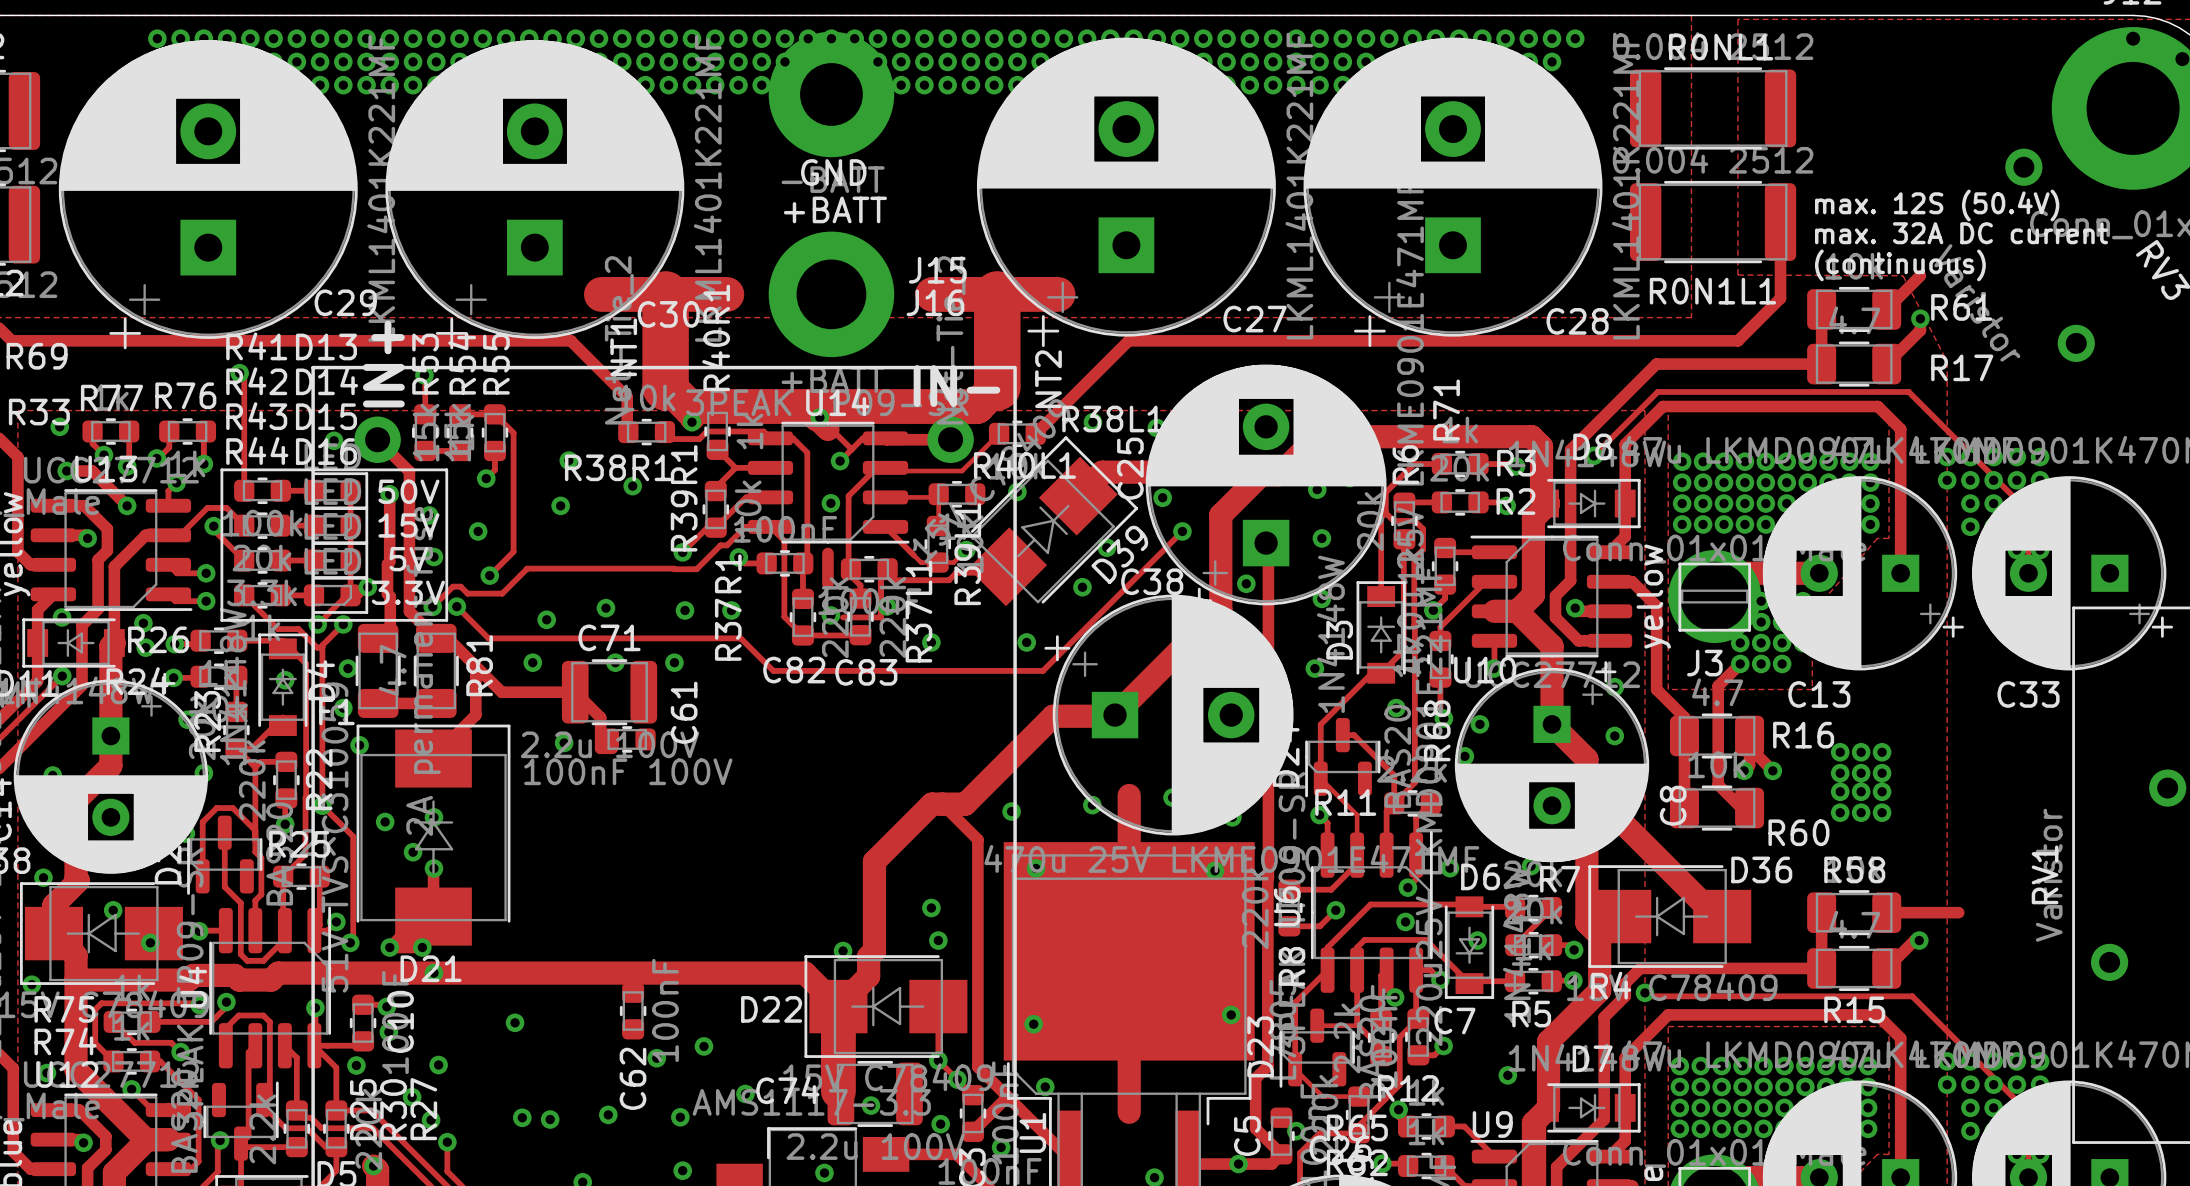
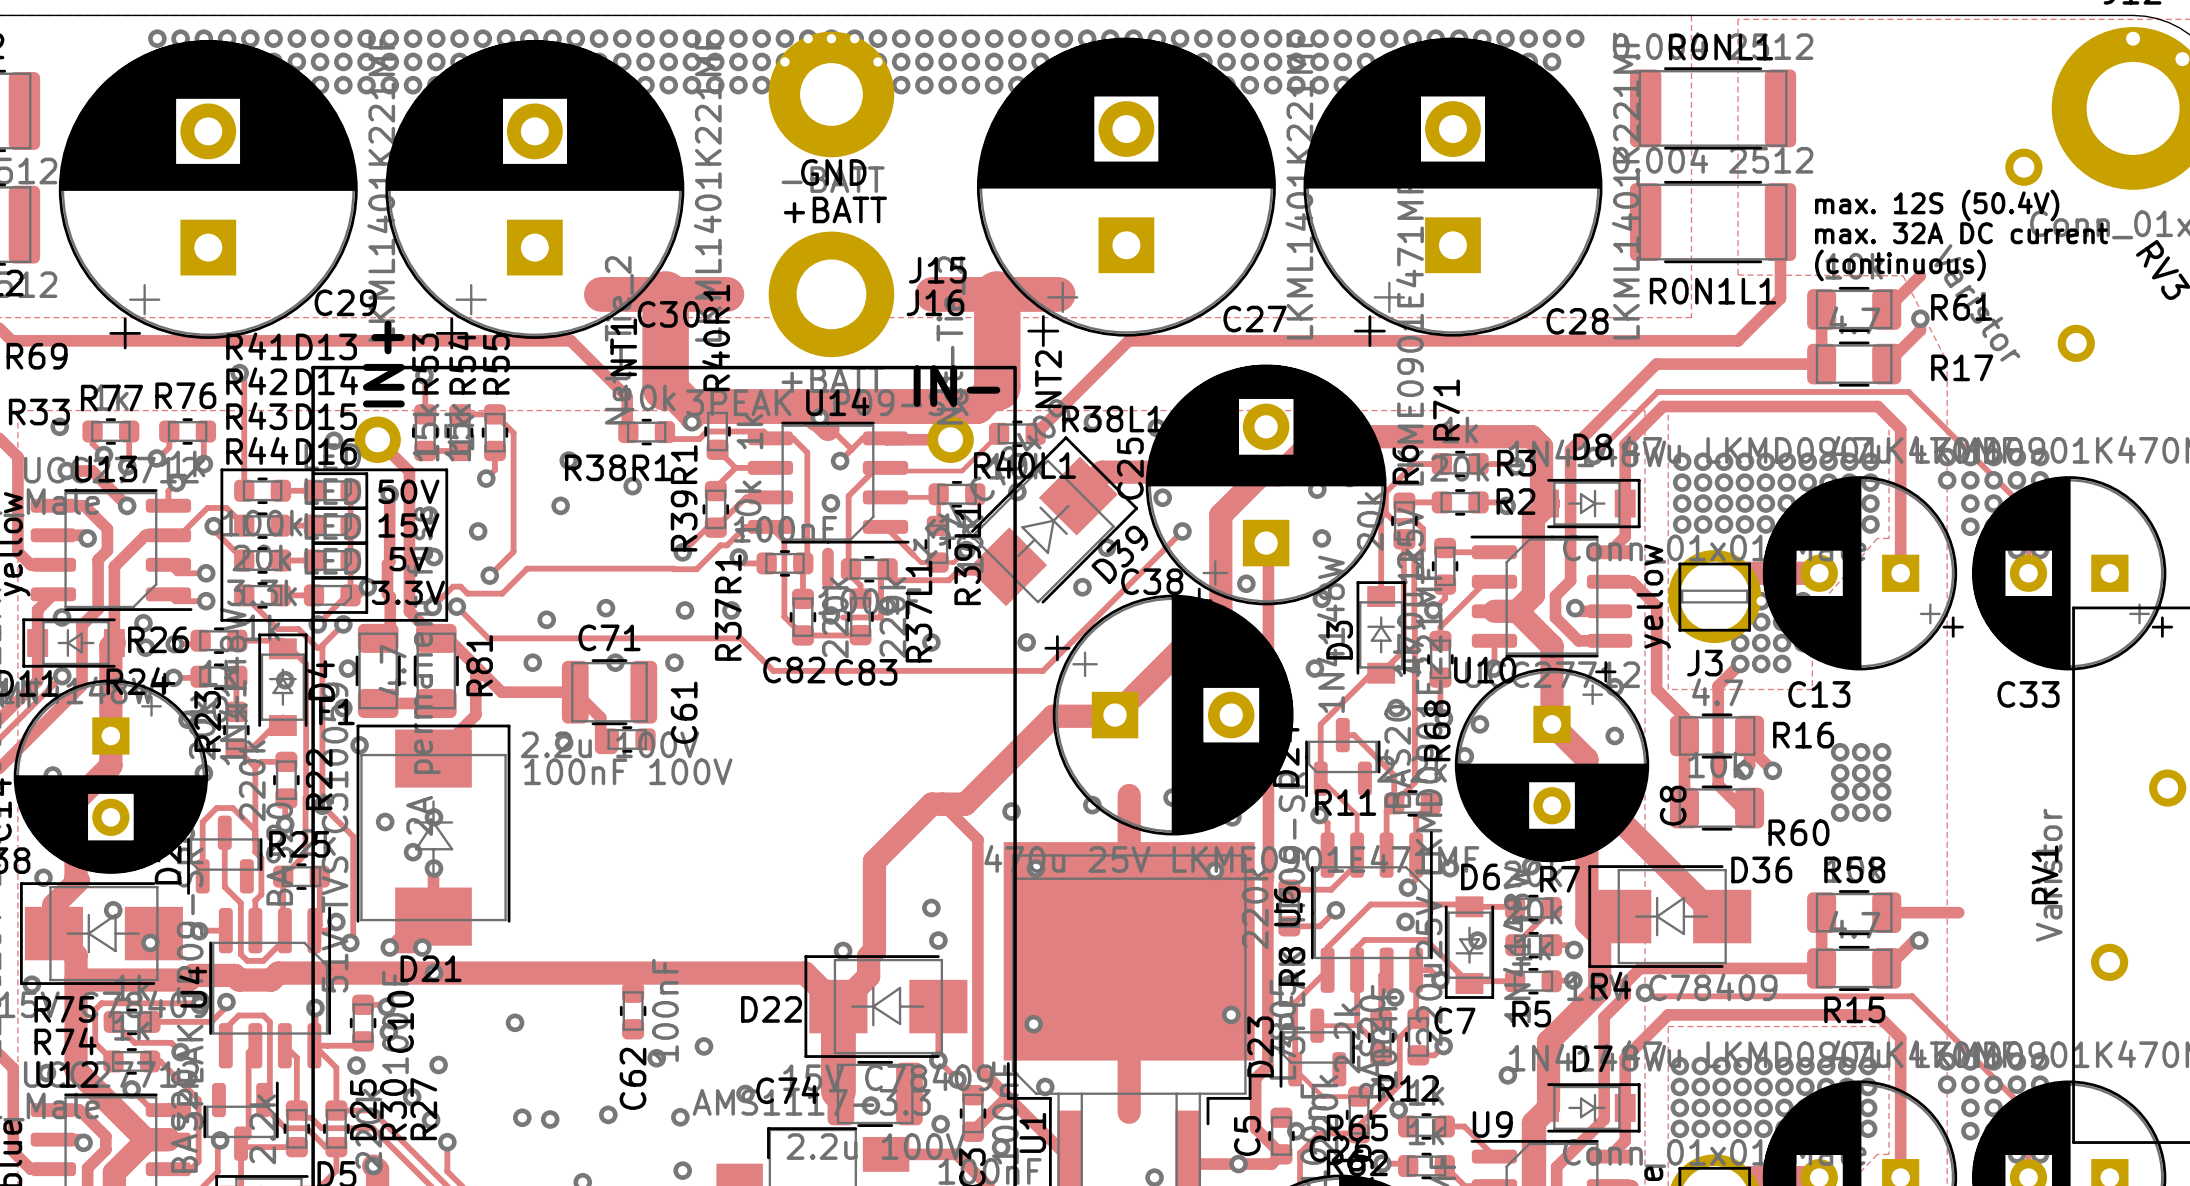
via: (824, 1172) -> none

